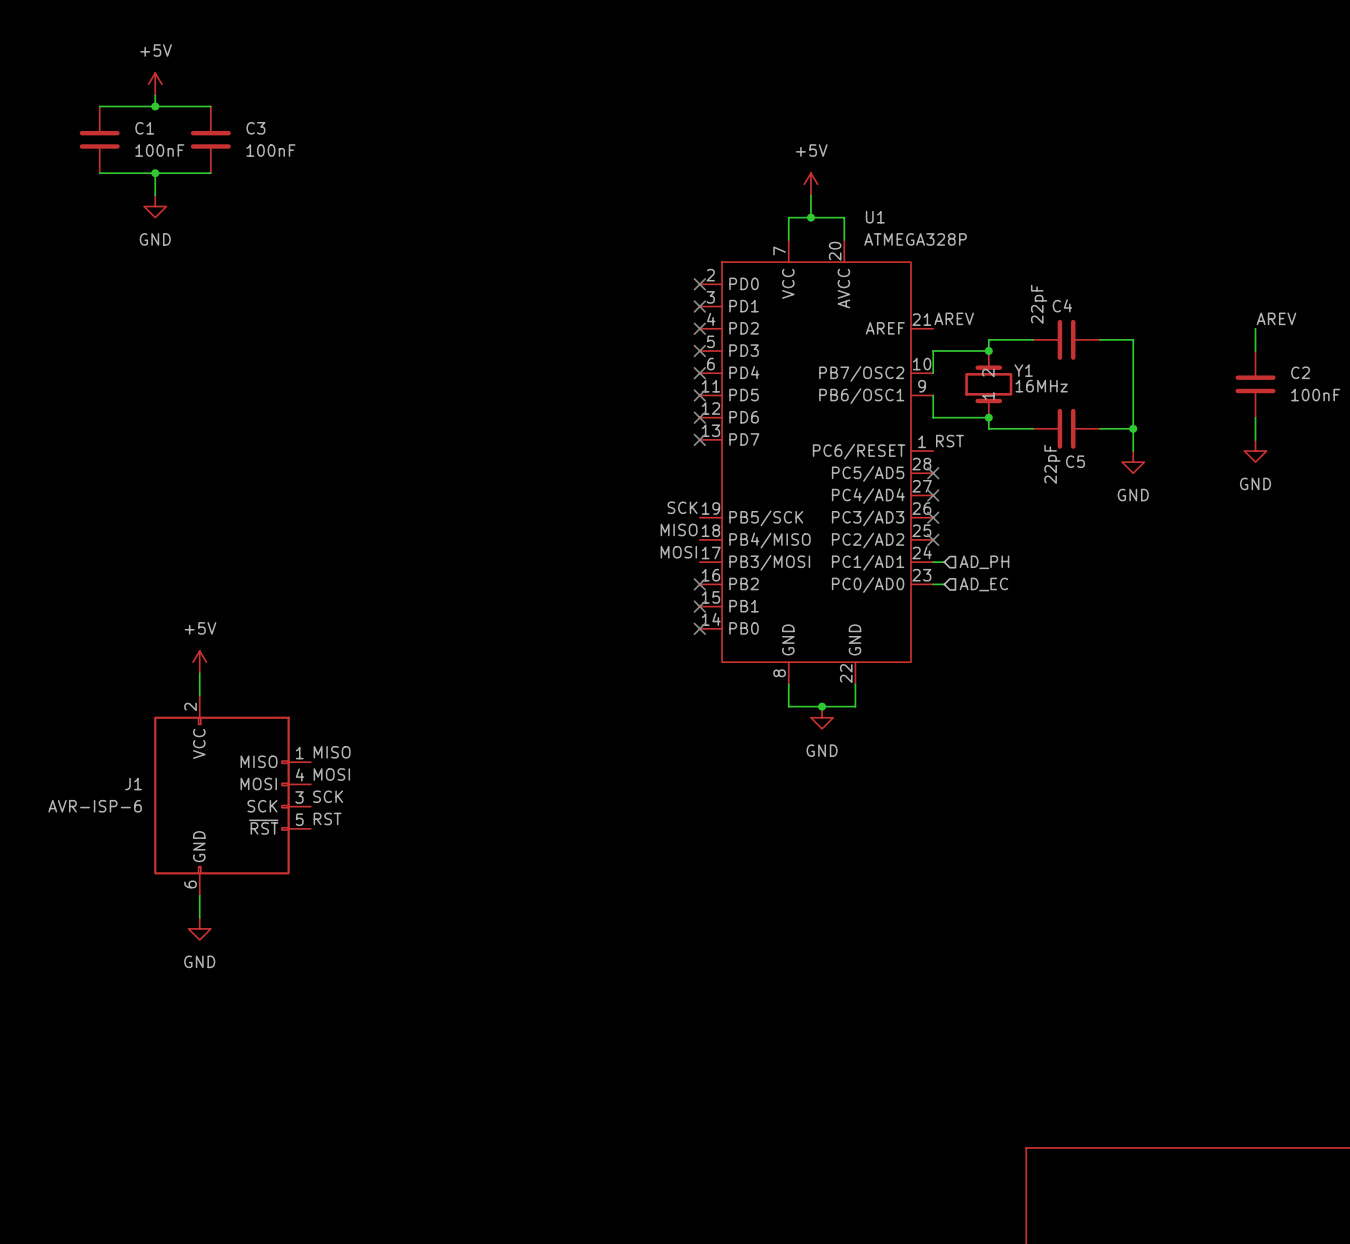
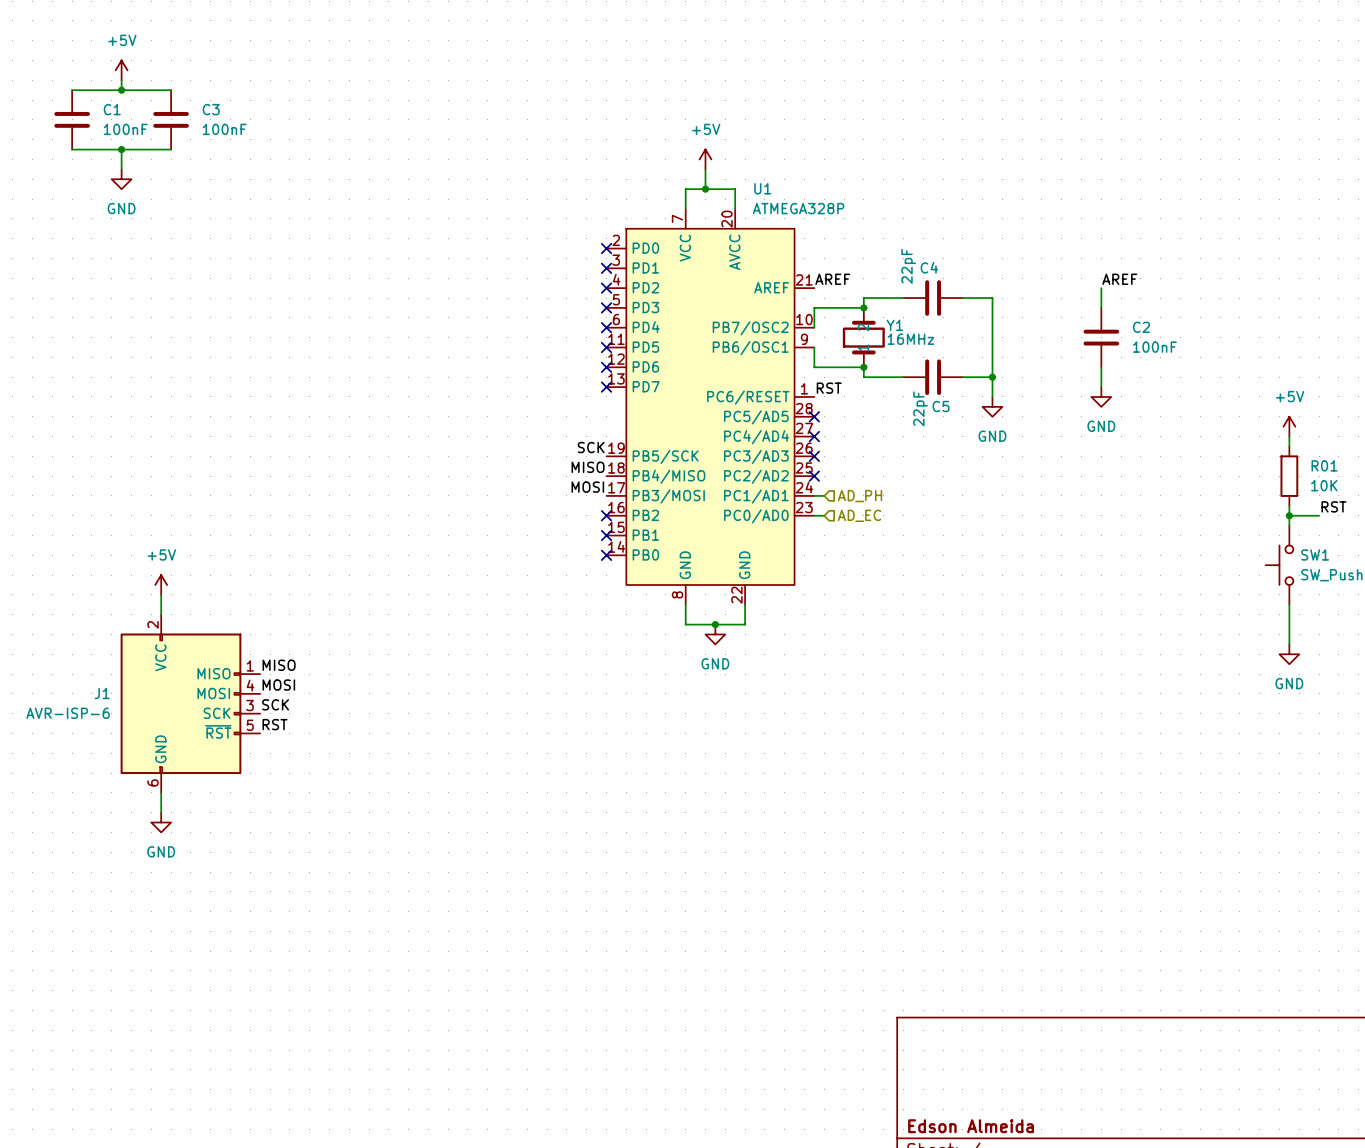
label: AREV (954, 318) -> AREF (832, 279)
label: AREV (1276, 318) -> AREF (1119, 279)

